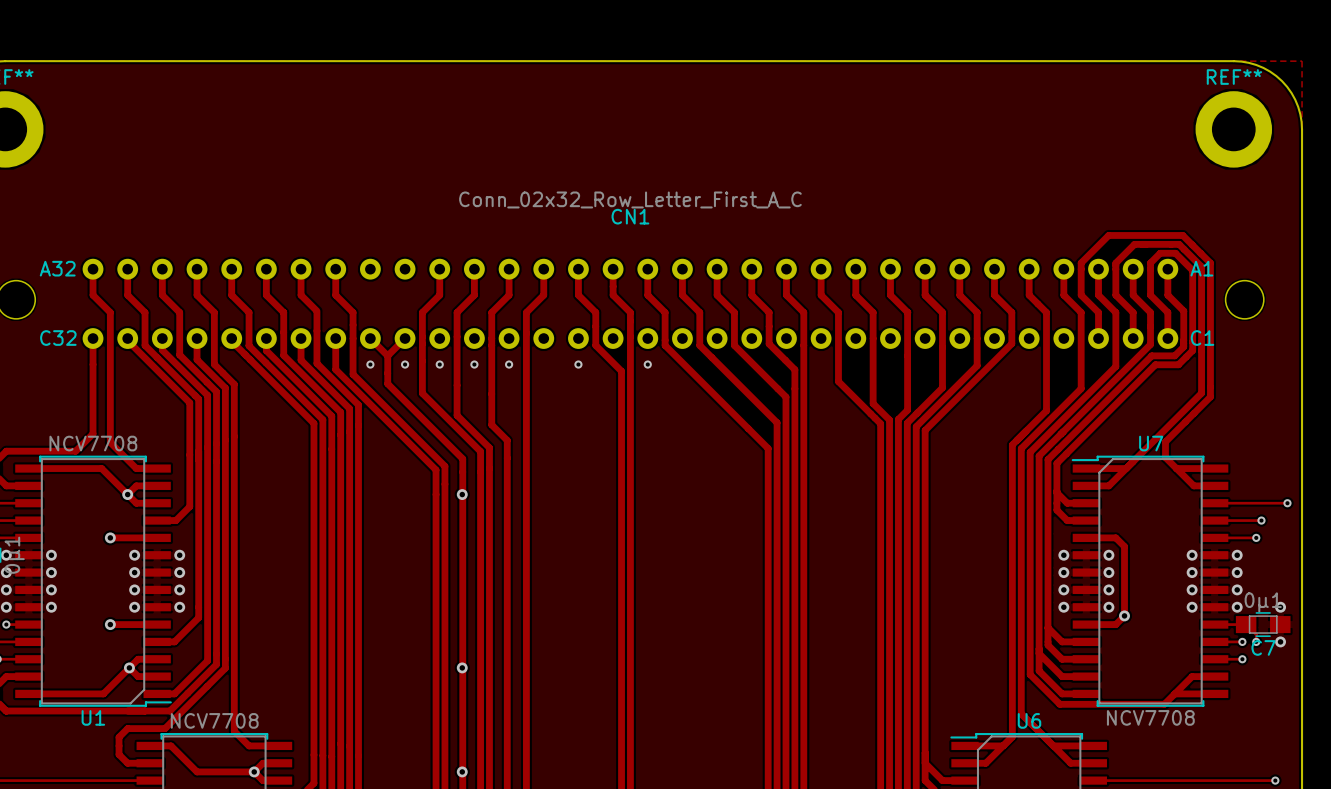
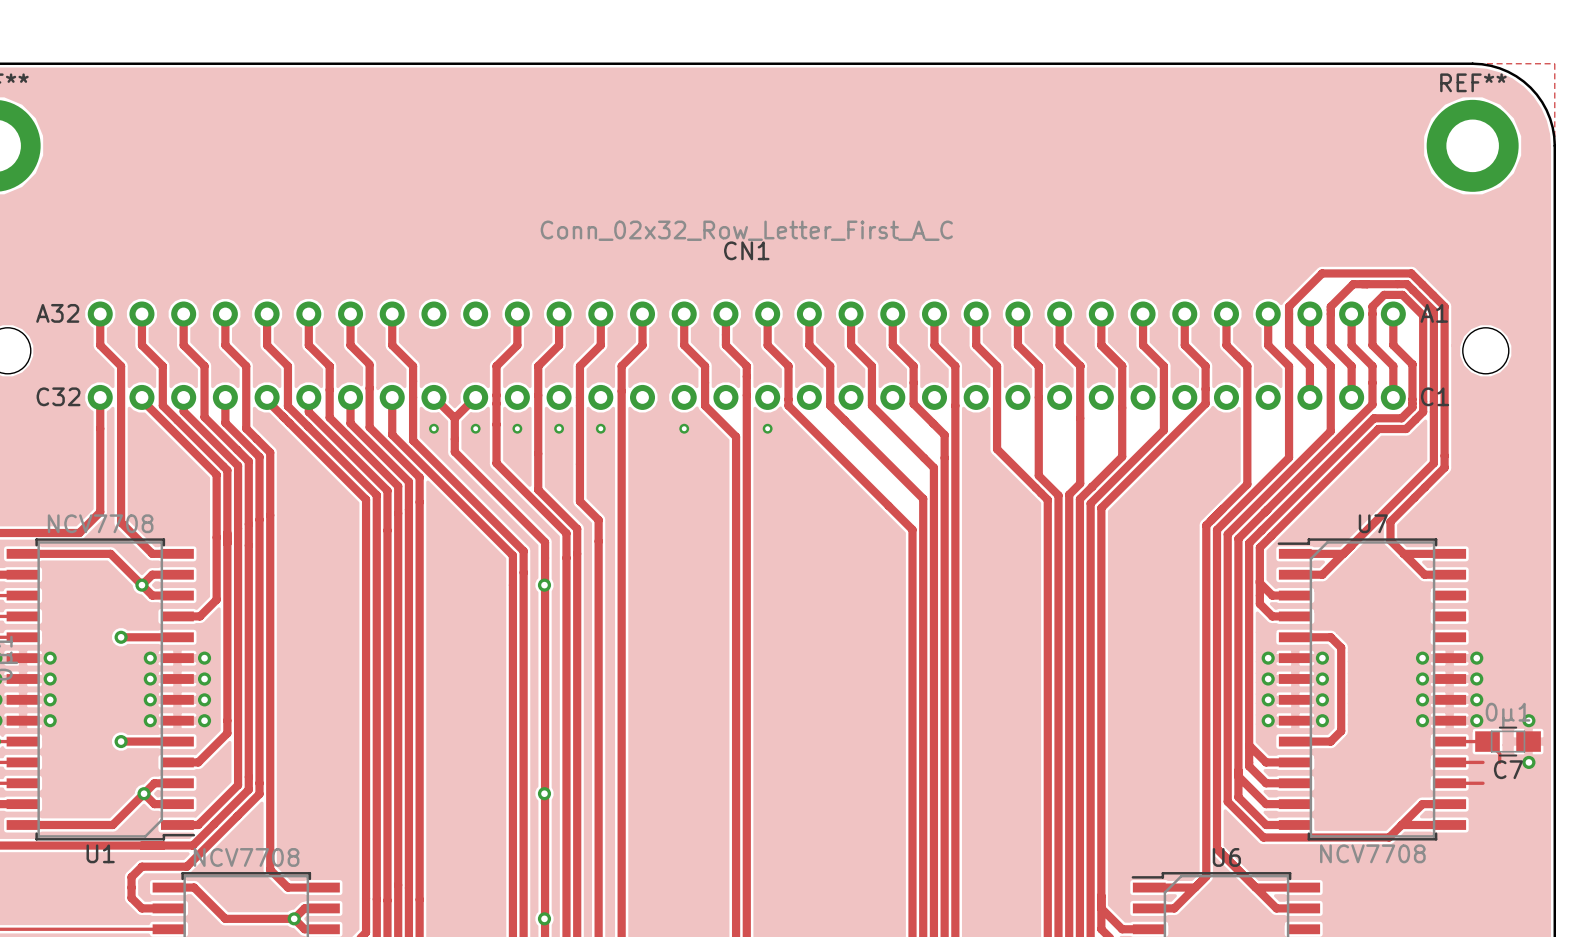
track: (1214, 503) (1287, 503) -> none
via: (1287, 503) -> none
track: (1214, 520) (1261, 520) -> none
via: (1261, 520) -> none
track: (1214, 537) (1256, 537) -> none
via: (1256, 537) -> none
via: (1124, 615) -> none
via: (1242, 641) -> none
via: (1256, 641) -> none
via: (1242, 659) -> none
track: (1093, 780) (1275, 780) -> none
via: (1275, 780) -> none

